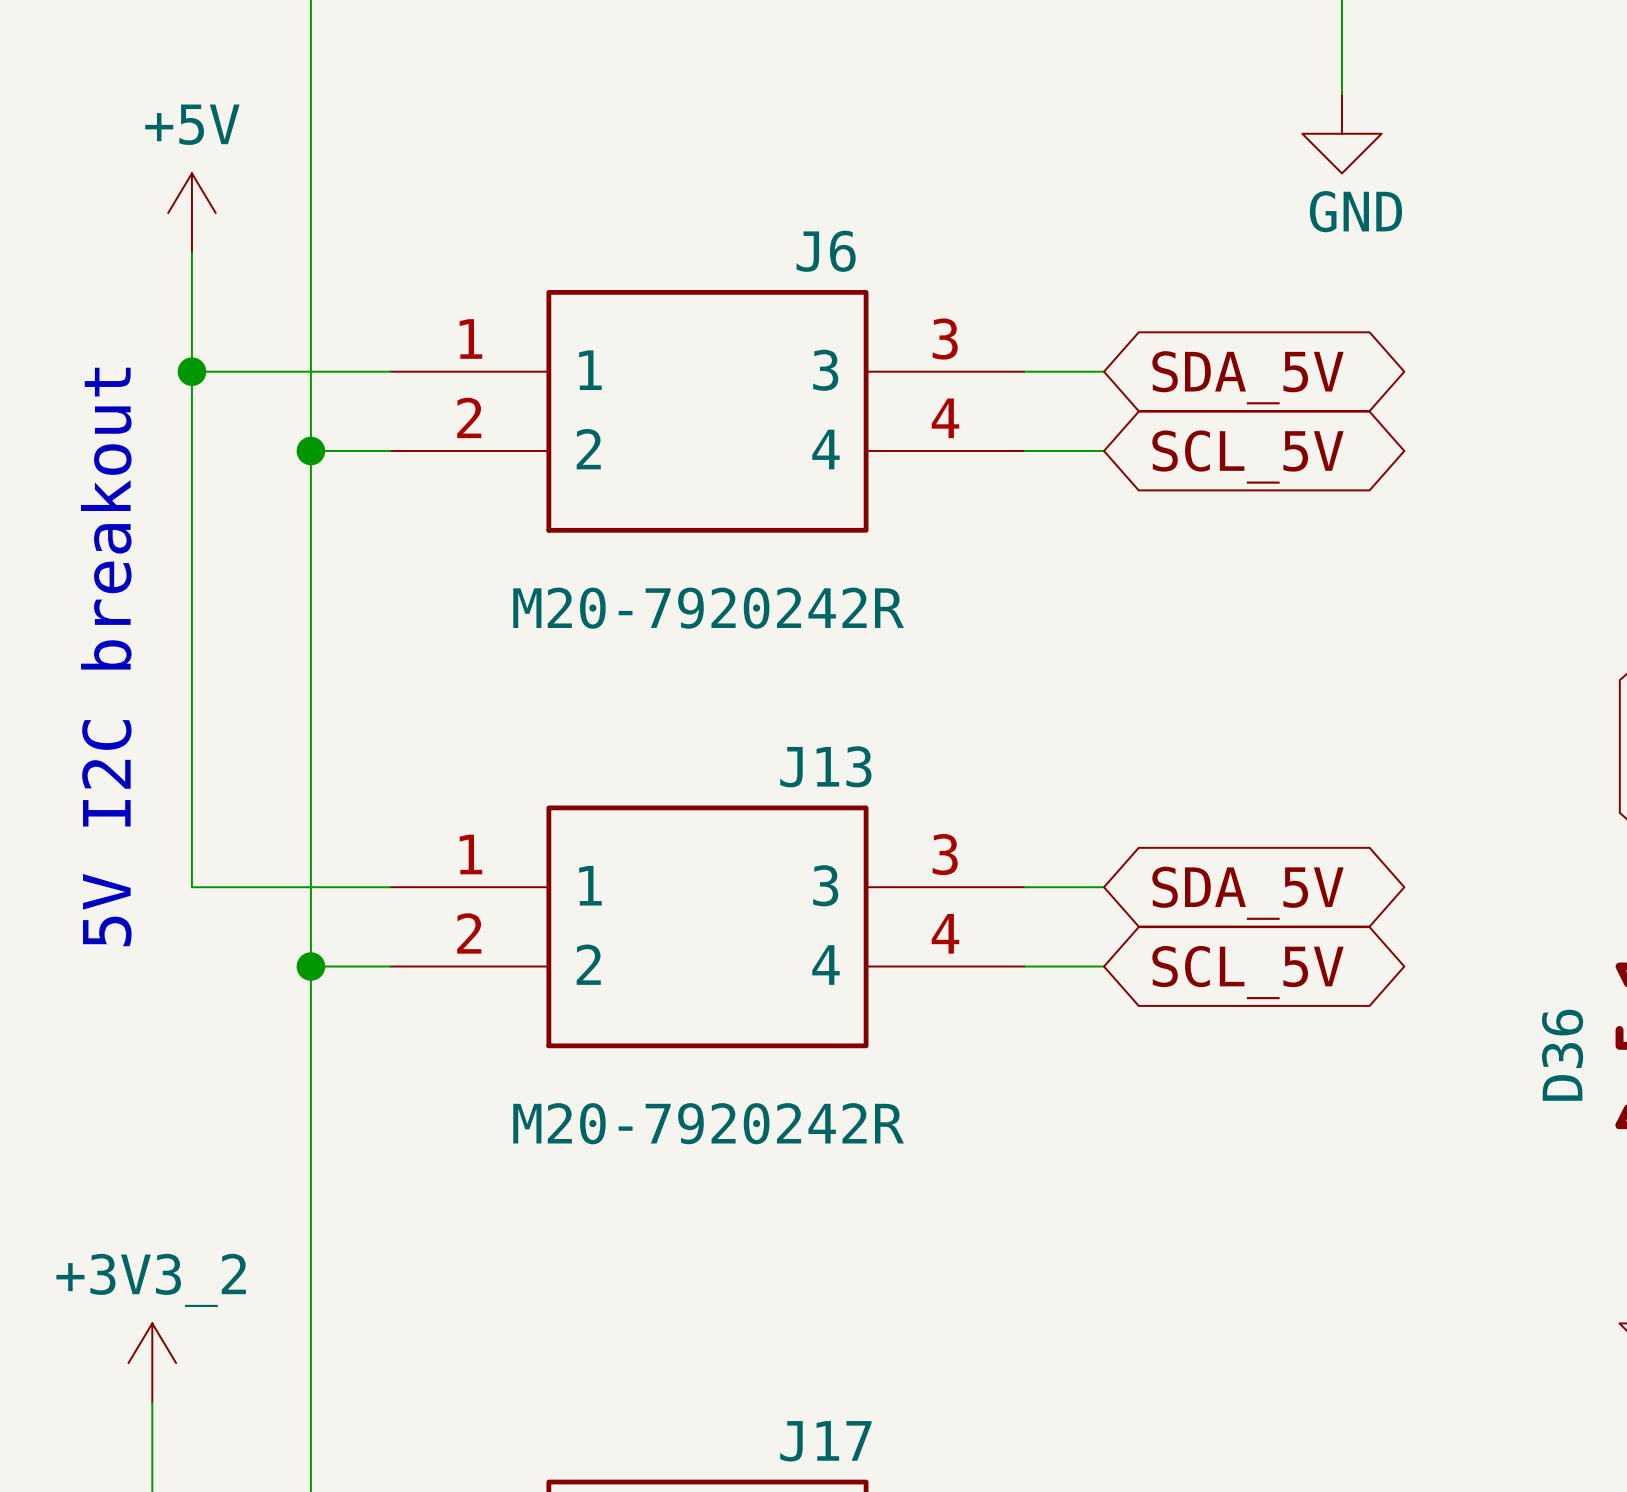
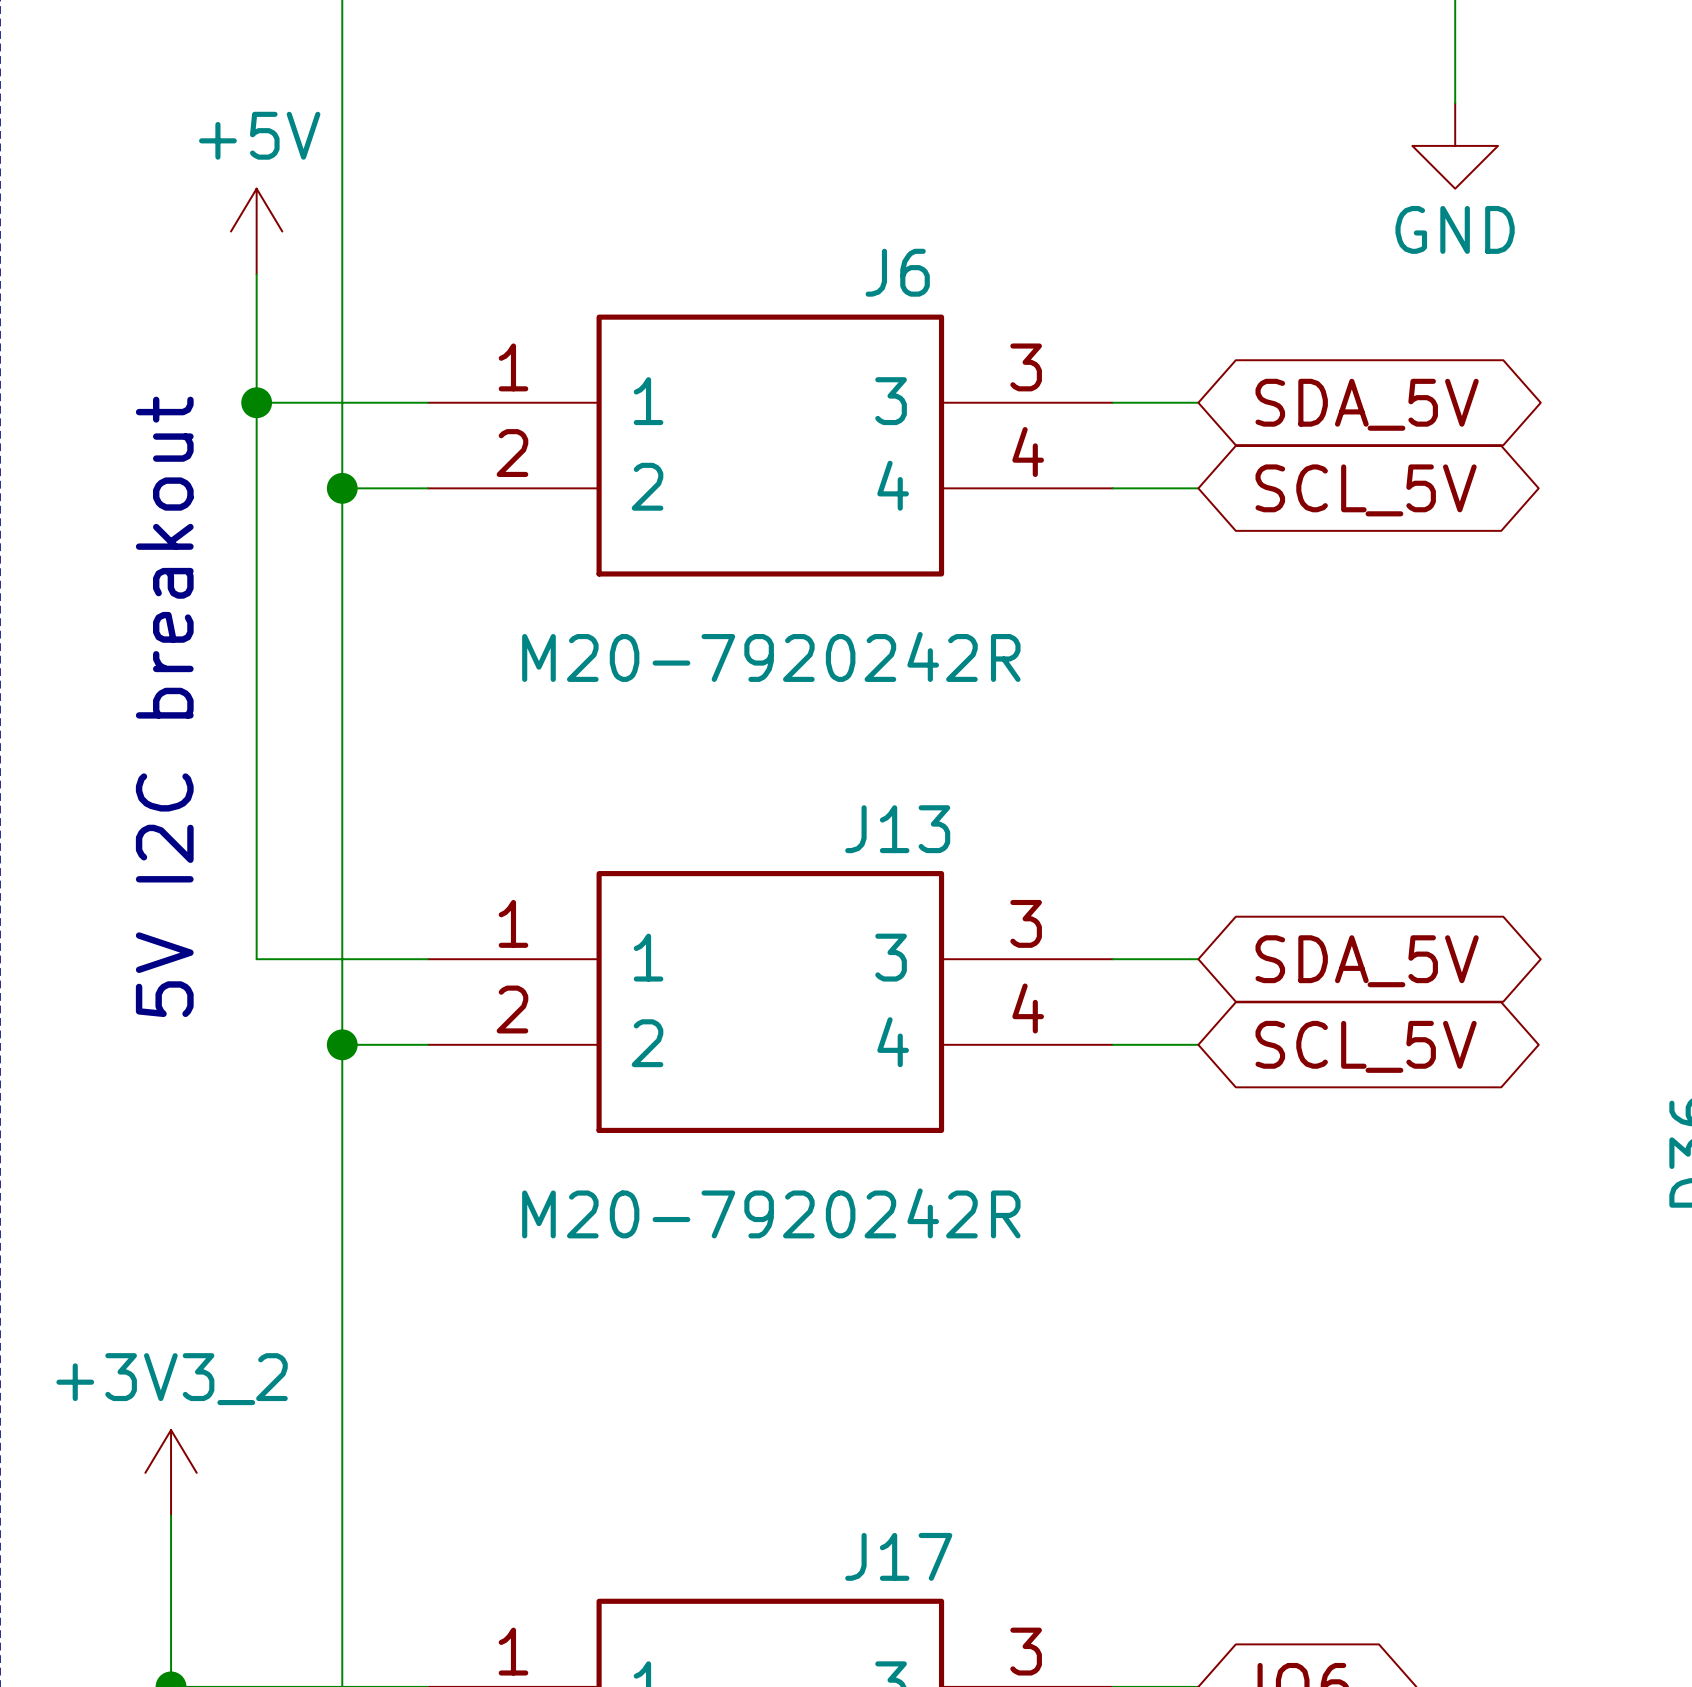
power symbol position: +5V (191, 213) -> +5V (256, 231)
wire: (191, 252) (191, 887) (231, 887) -> (256, 274) (256, 959)
wire: (191, 371) (231, 371) -> none
junction position: (191, 371) -> (256, 402)
text position: 5V I2C breakout (106, 656) -> 5V I2C breakout (164, 706)

